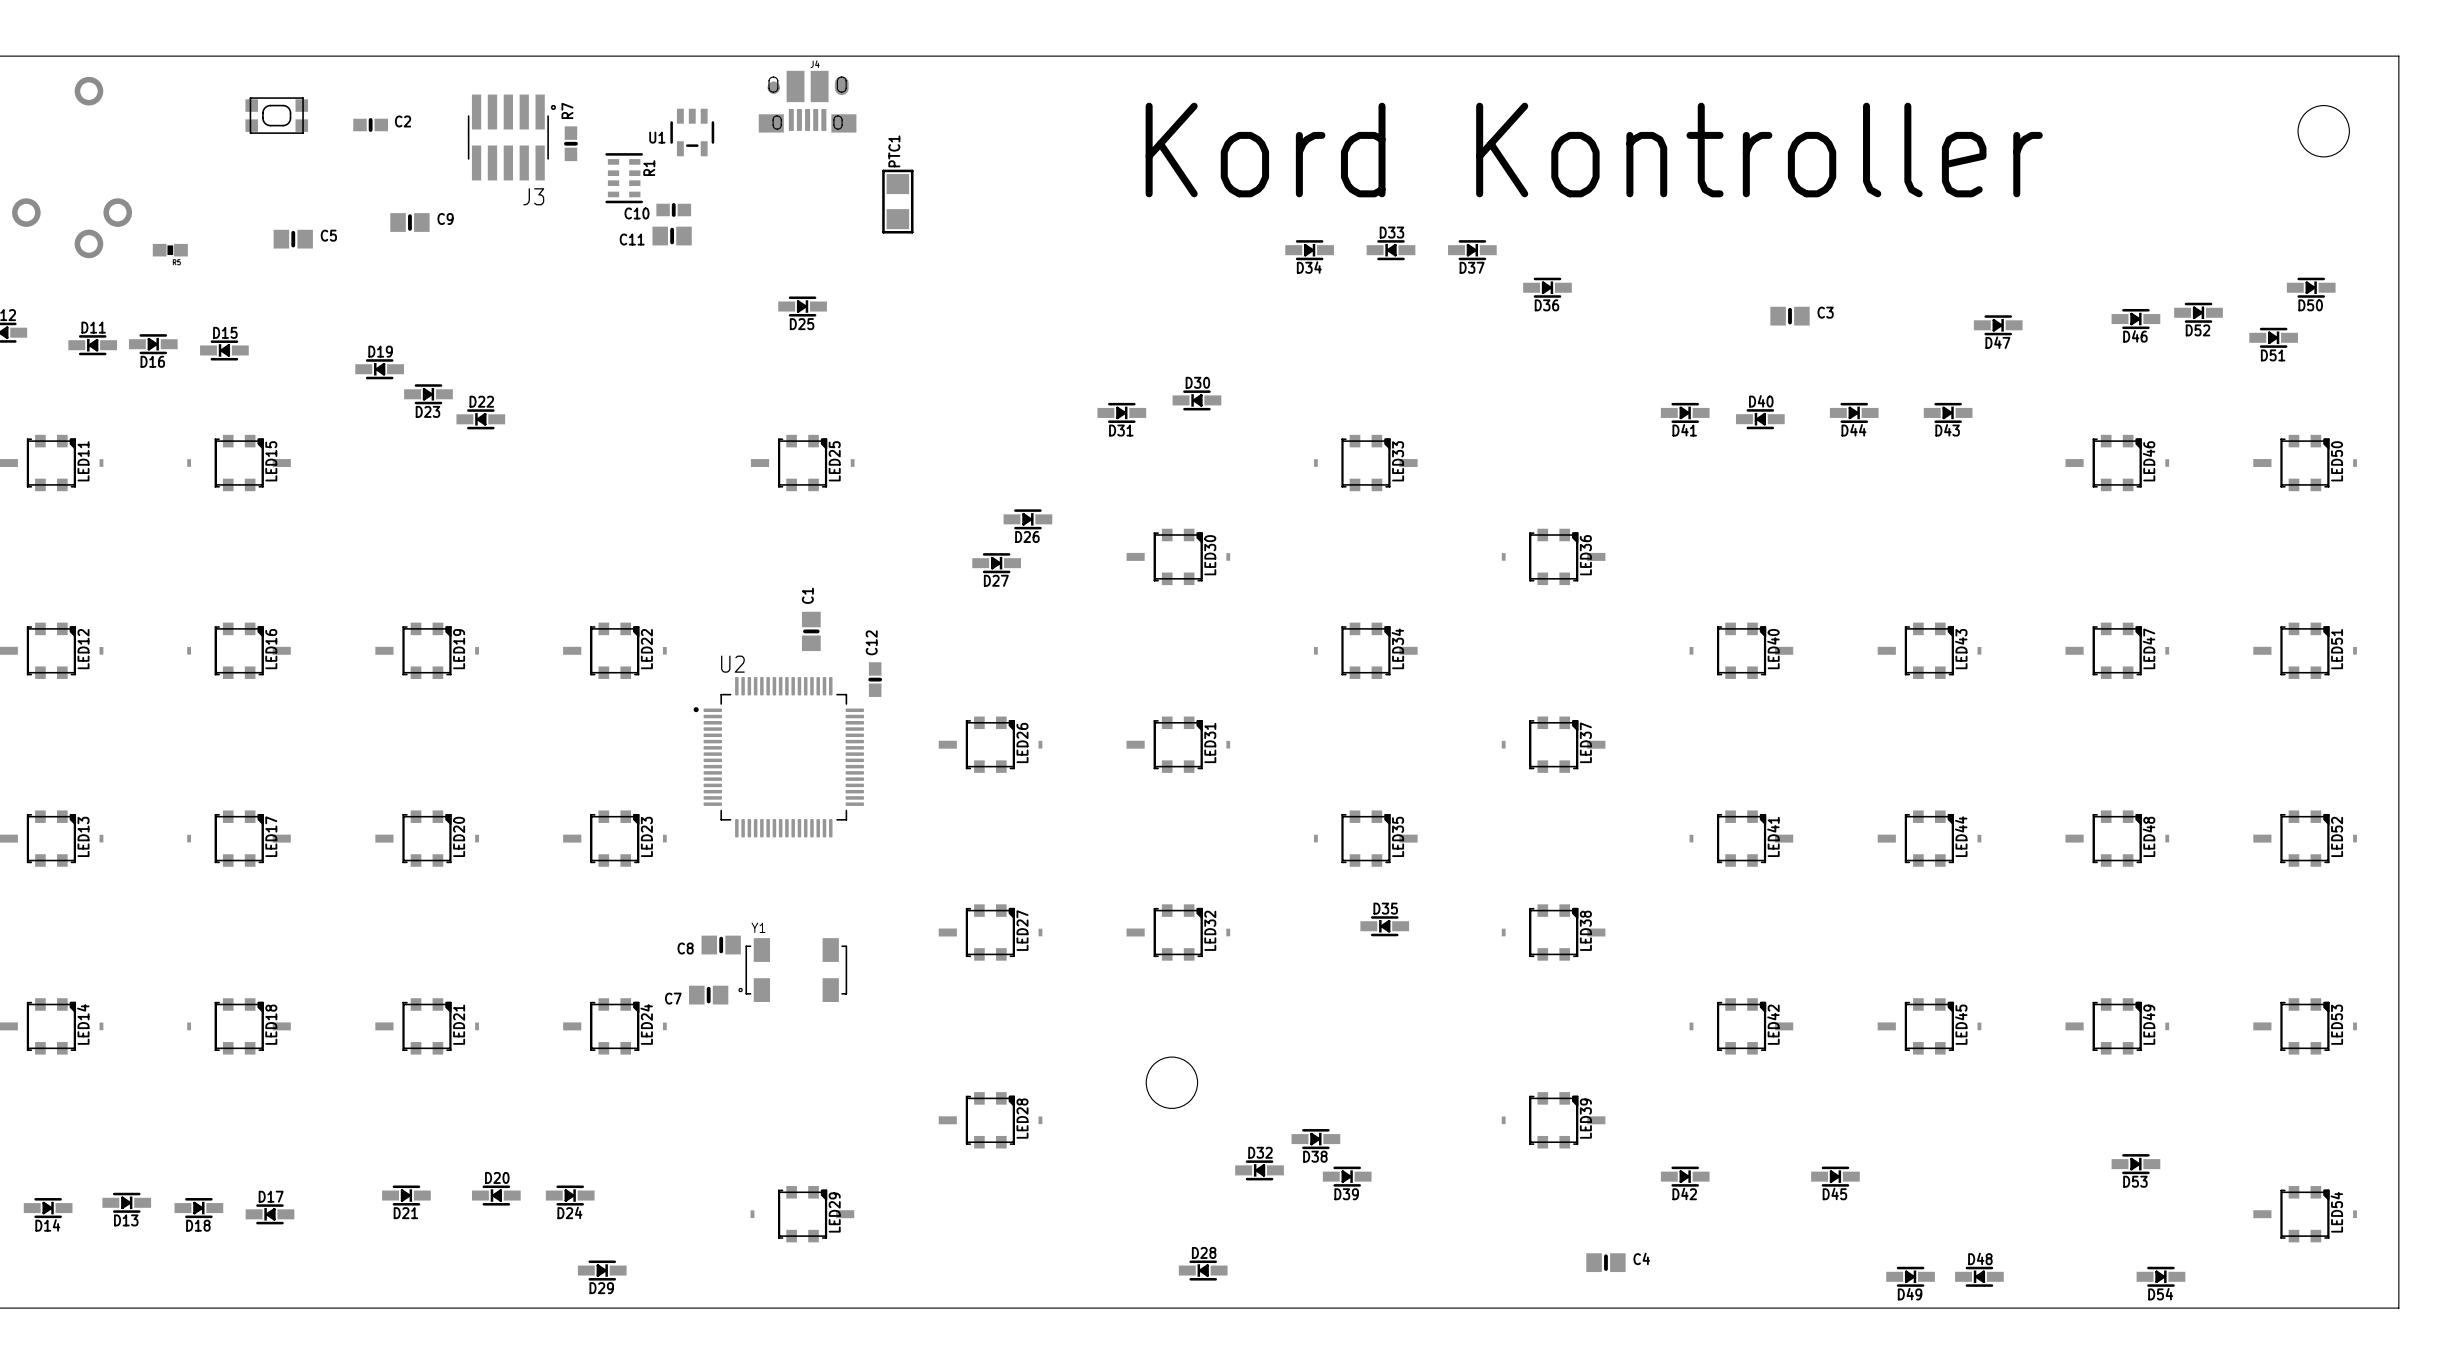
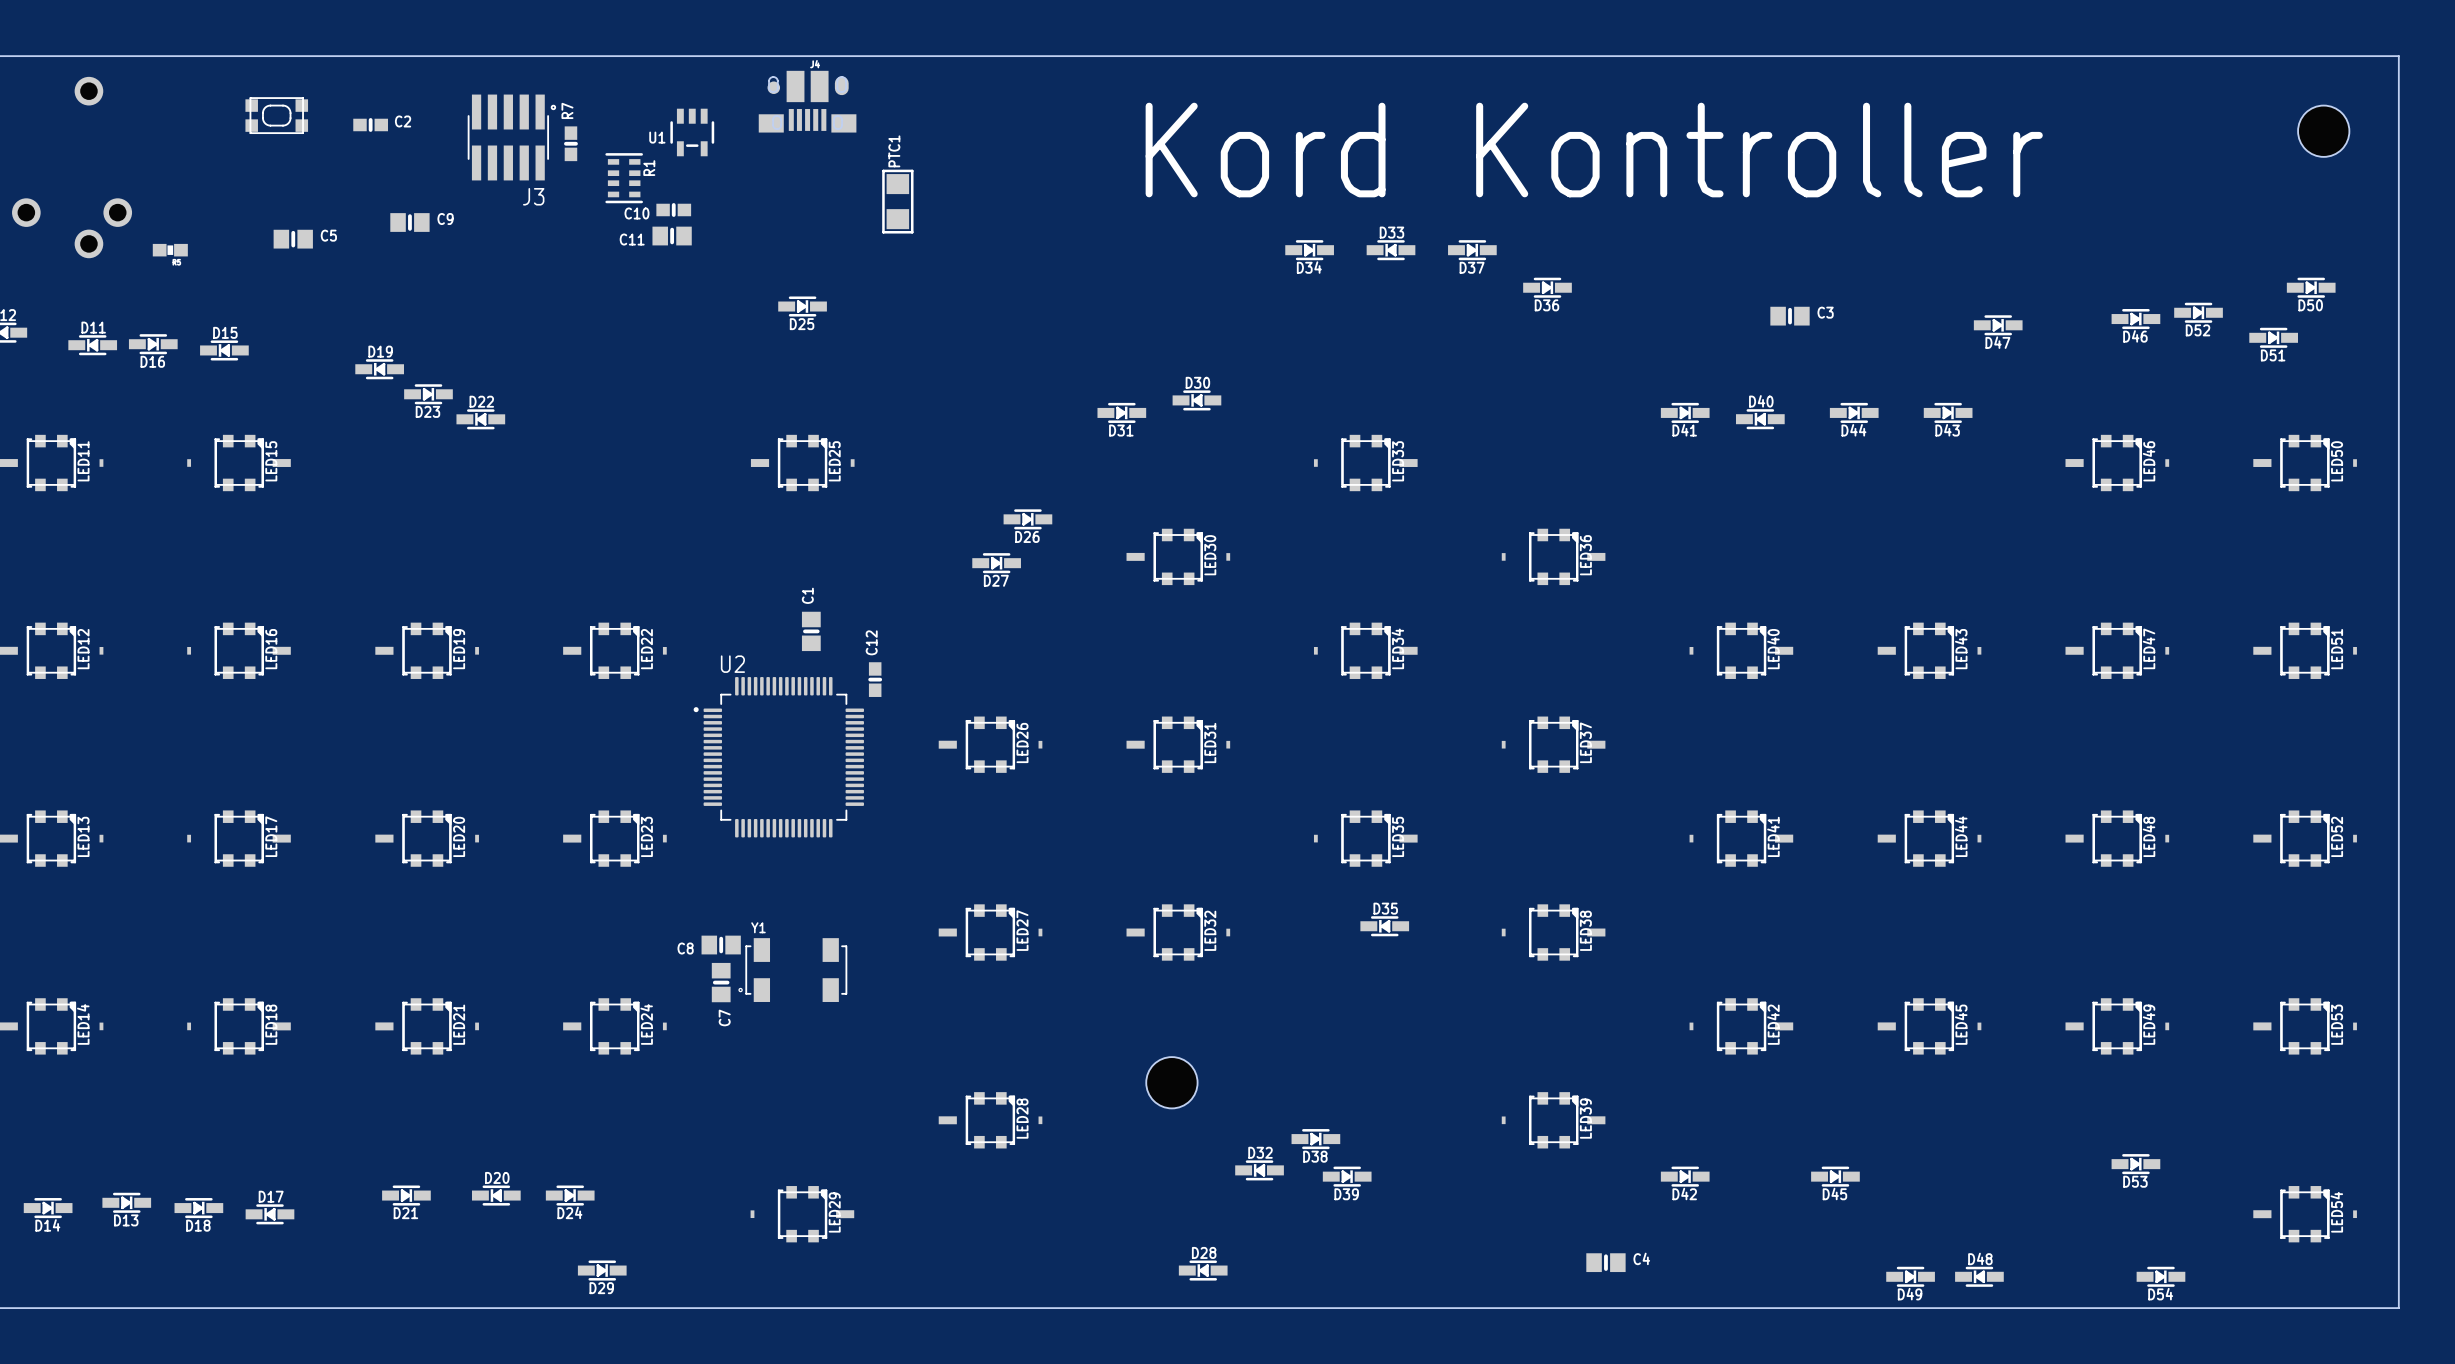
C7 rotation: 0° (708, 995) -> 90° clockwise (721, 982)
C7 name position: C7 (673, 998) -> C7 (724, 1017)

